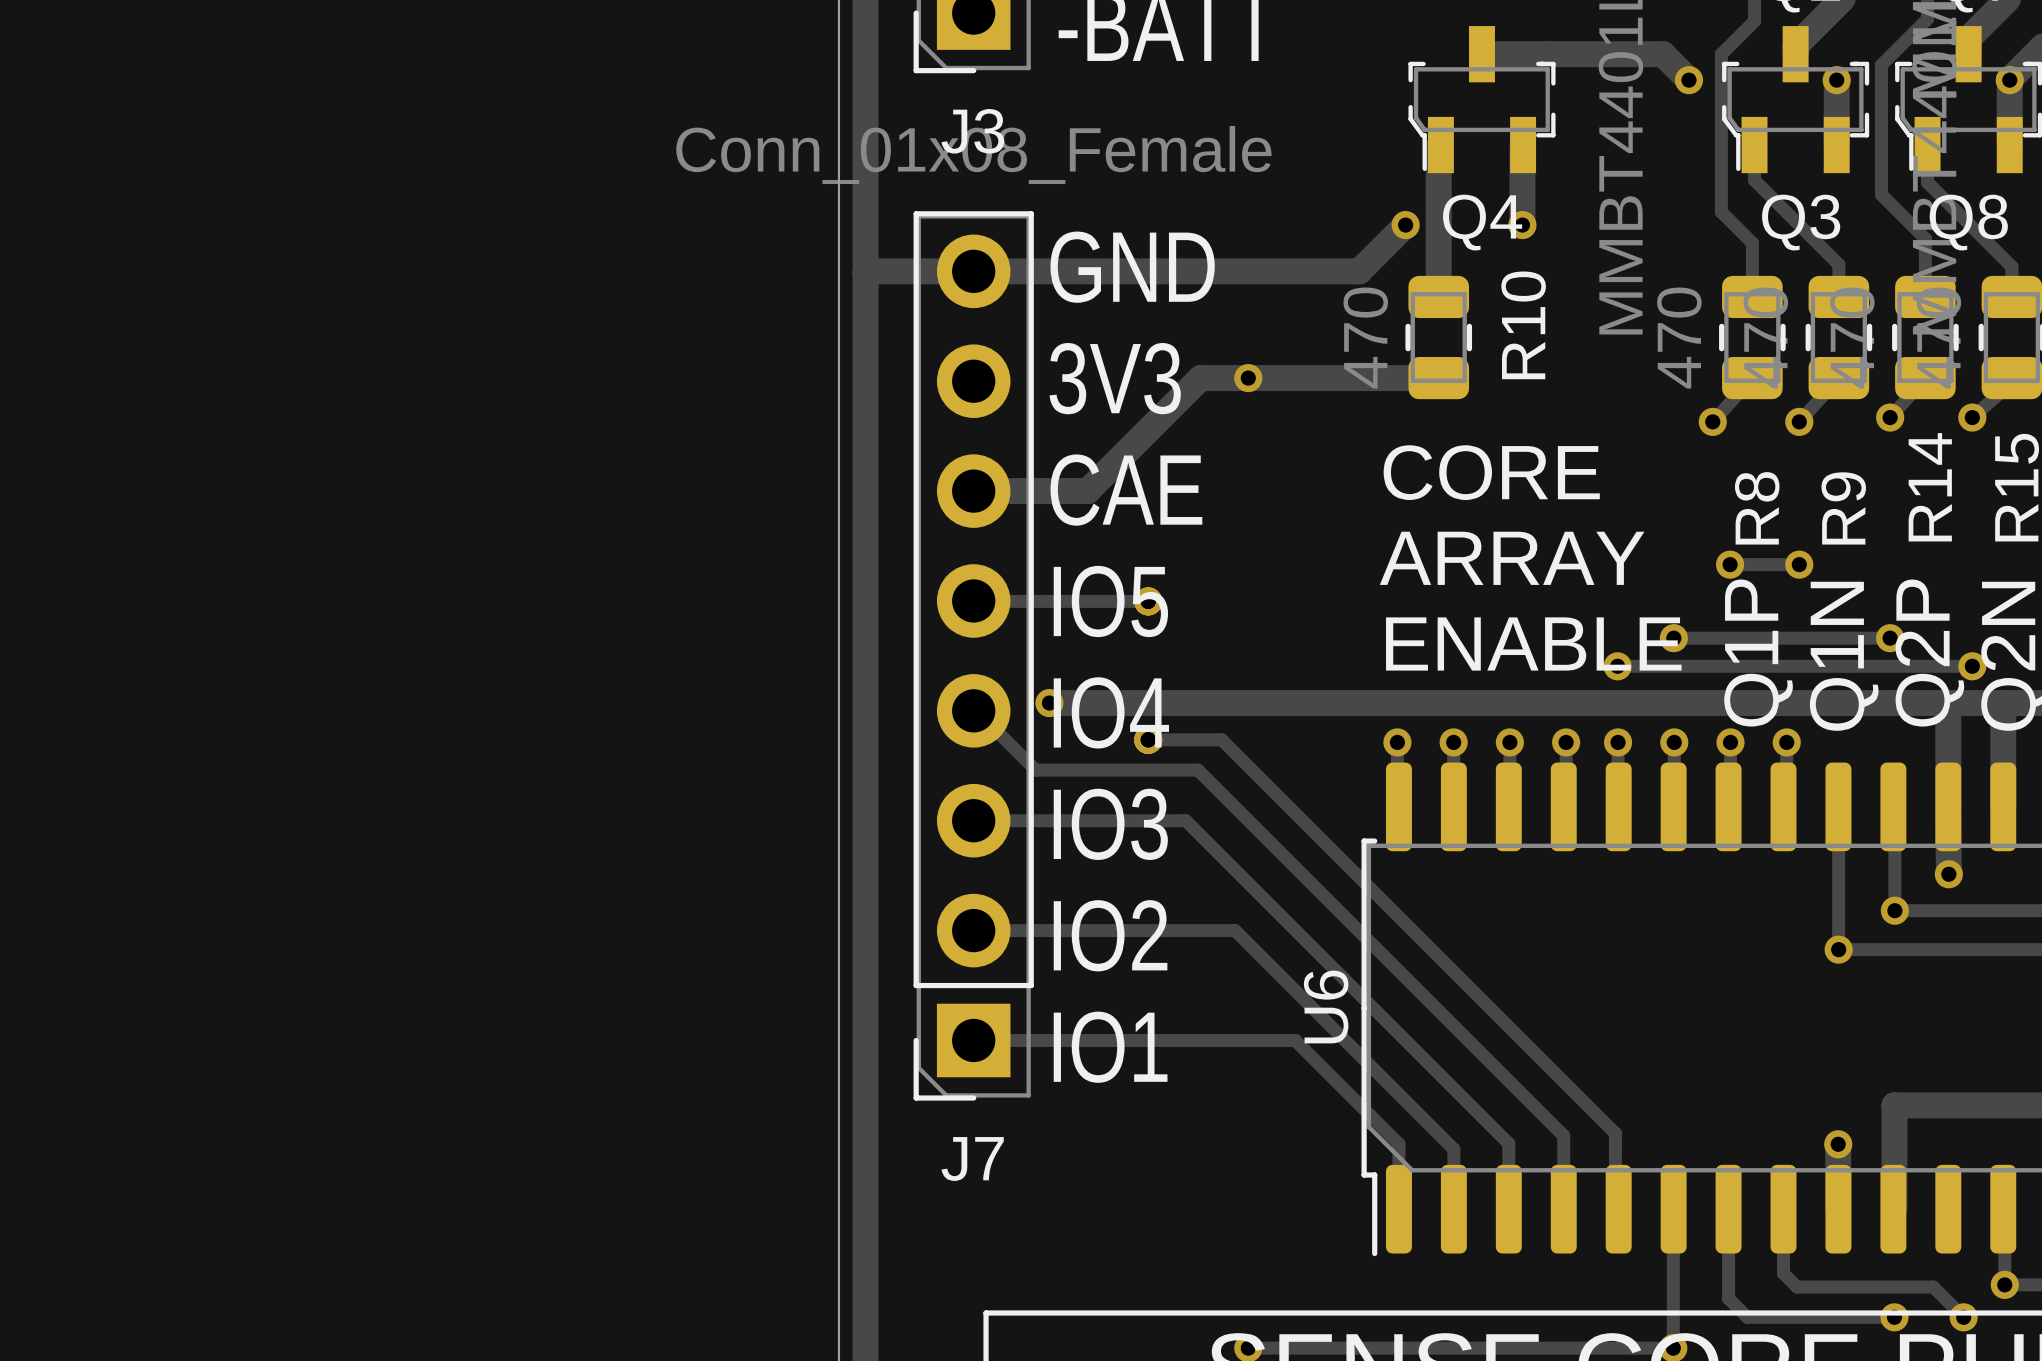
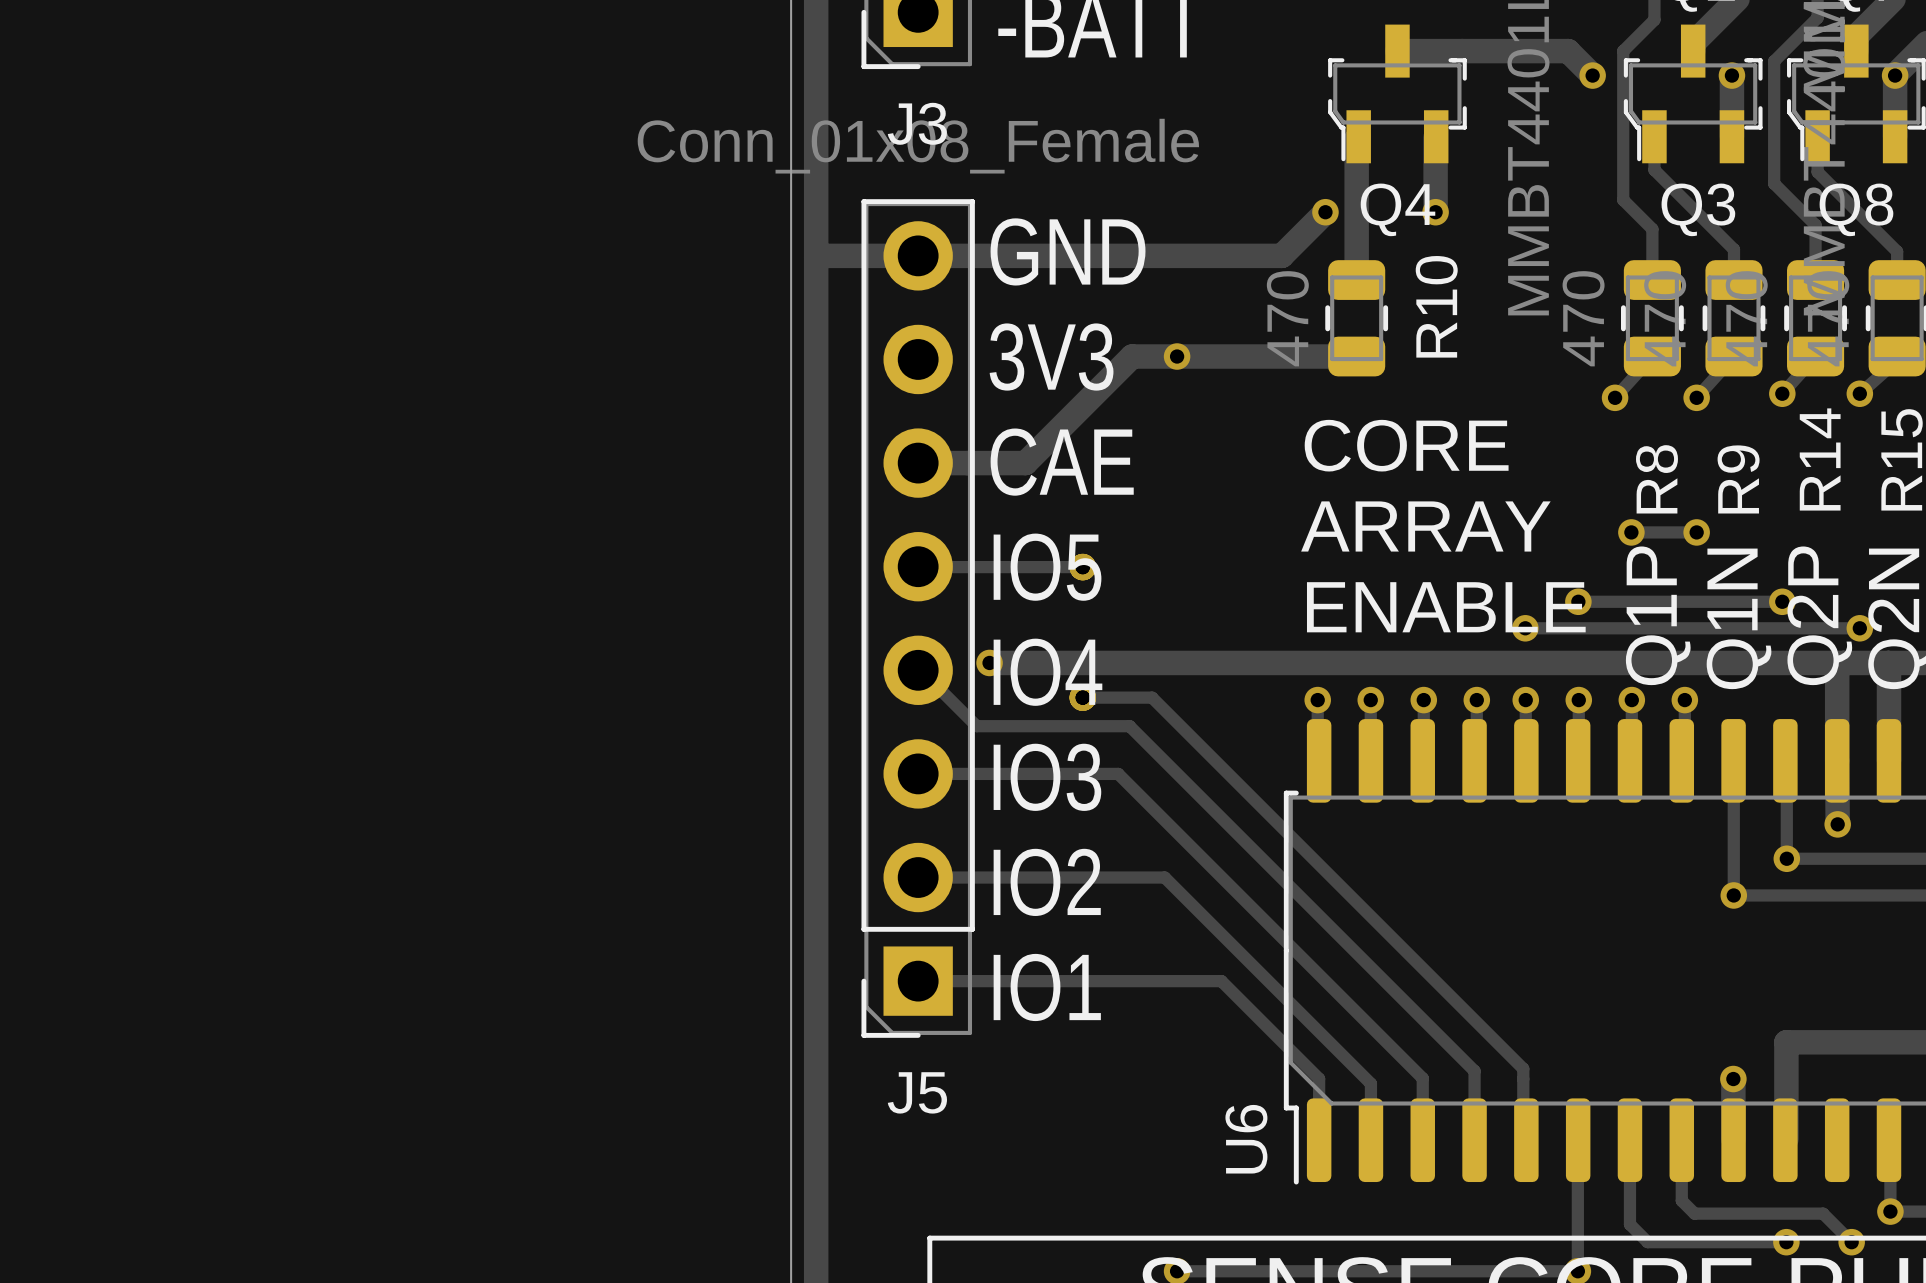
U6 name position: U6 (1326, 1006) -> U6 (1246, 1139)
J7 name: J7 (972, 1159) -> J5 (917, 1092)

